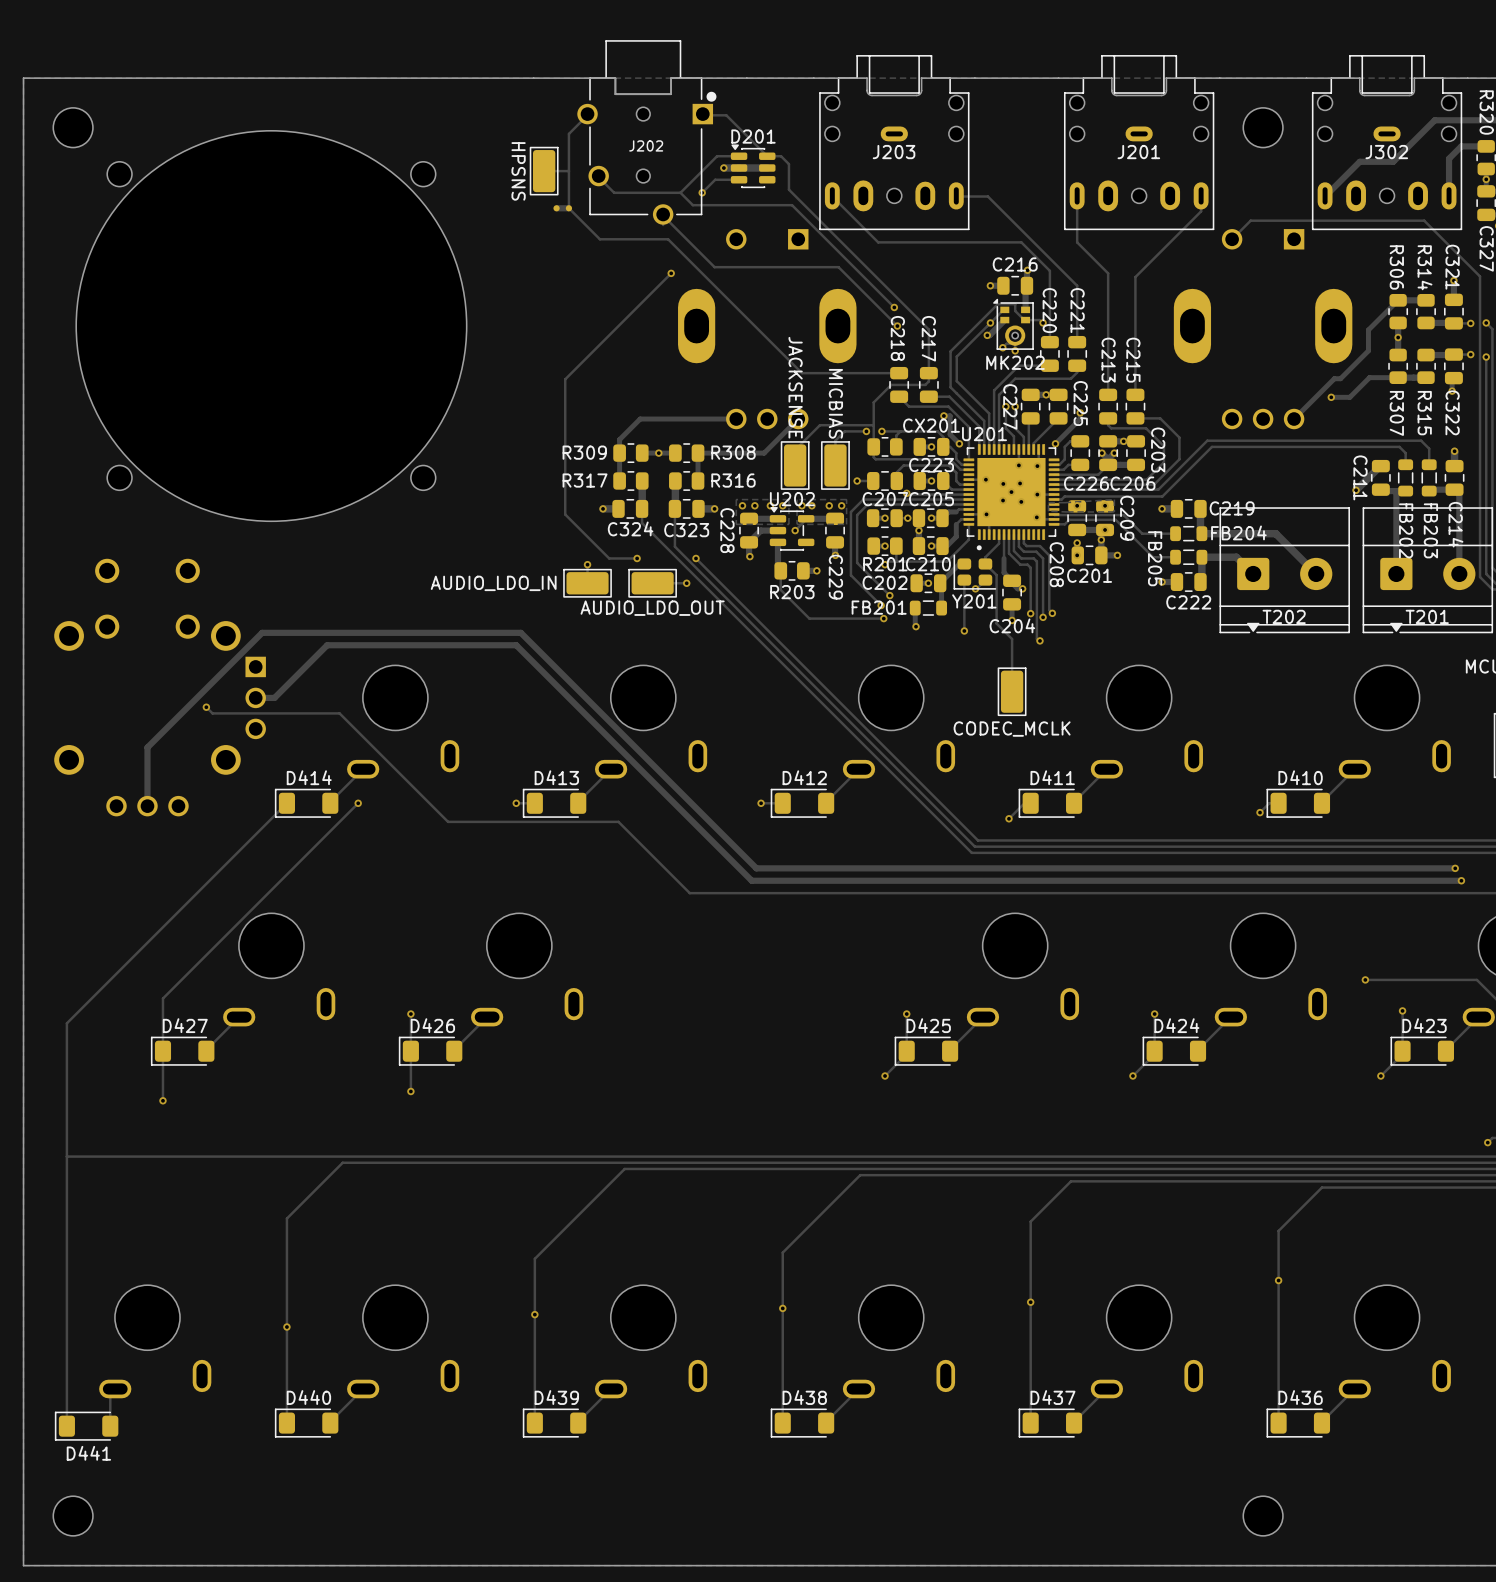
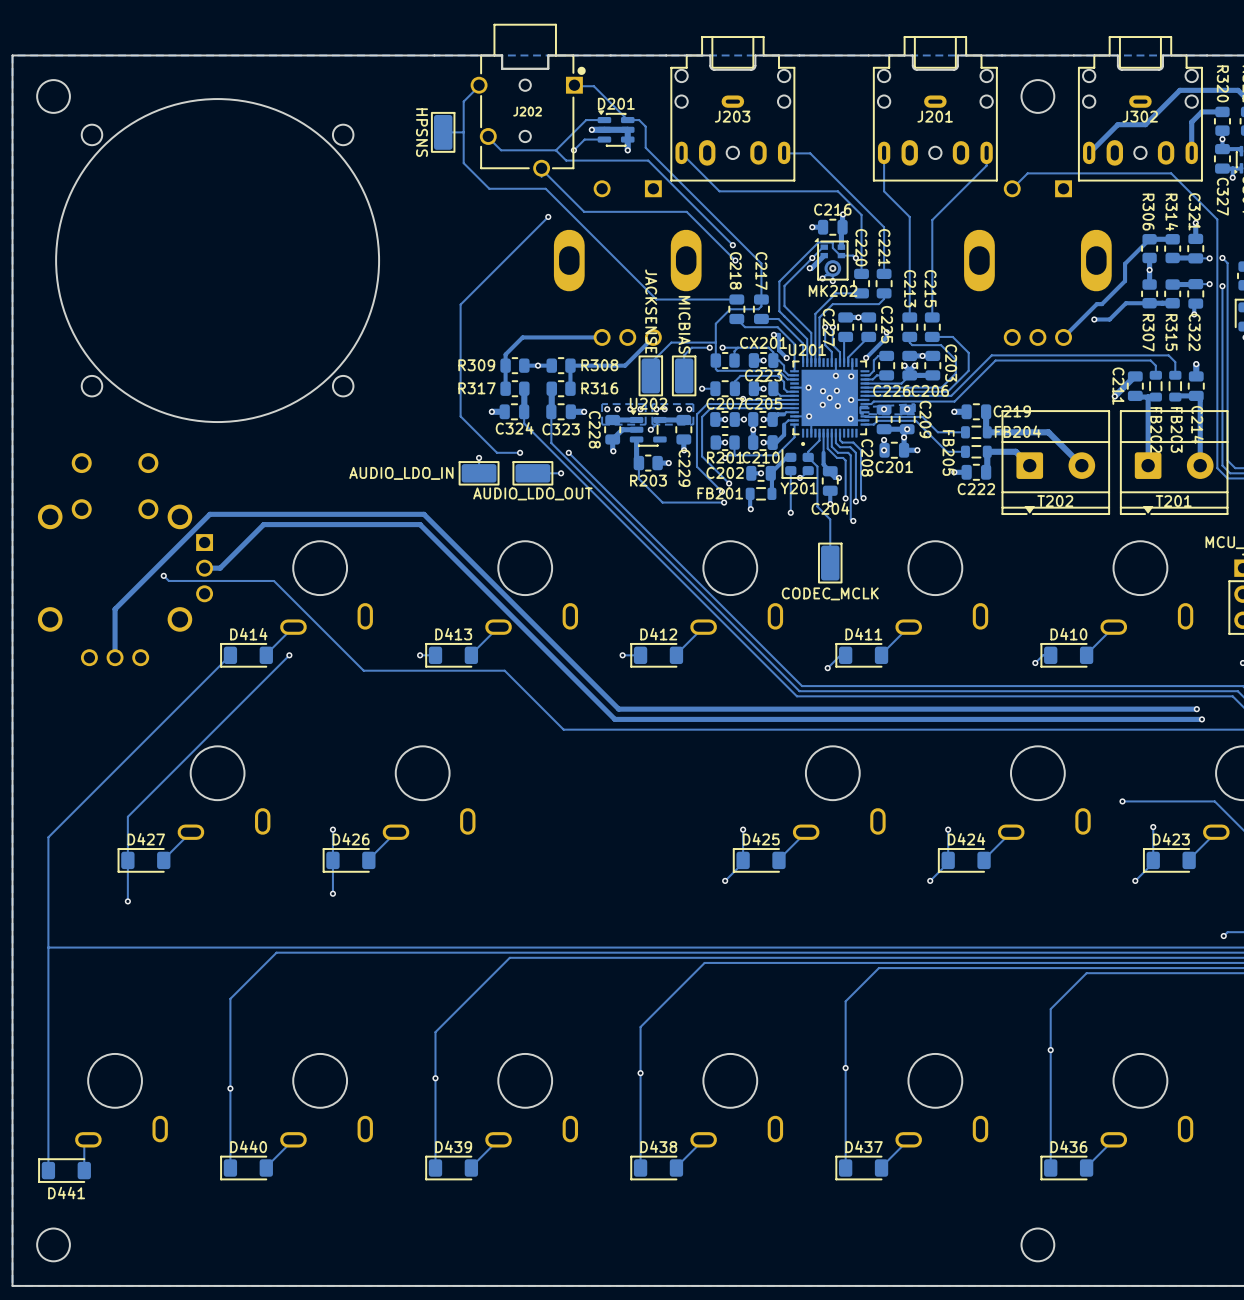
track: none -> (627, 129) (627, 150)
via: none -> (627, 150)
part: (562, 208) -> none

